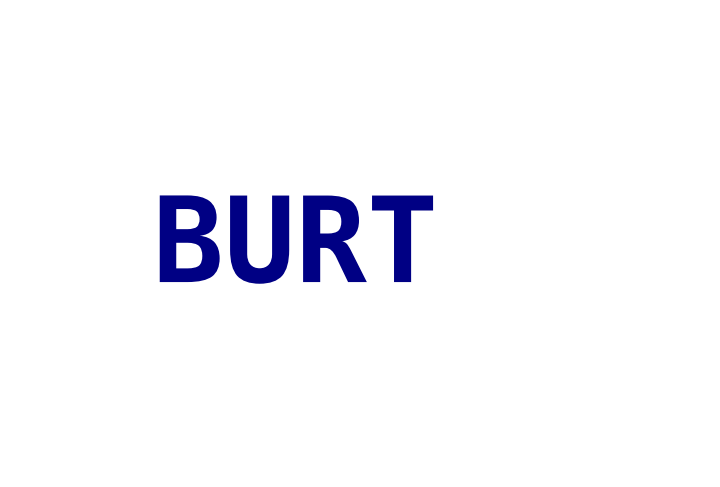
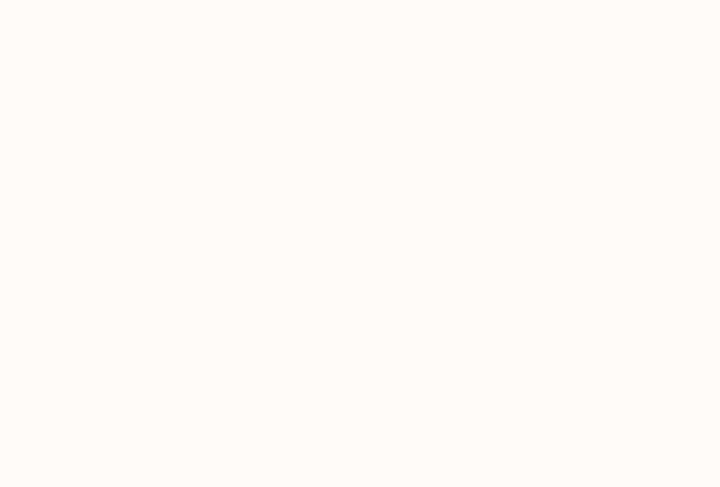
text: BURT (296, 239) -> none

